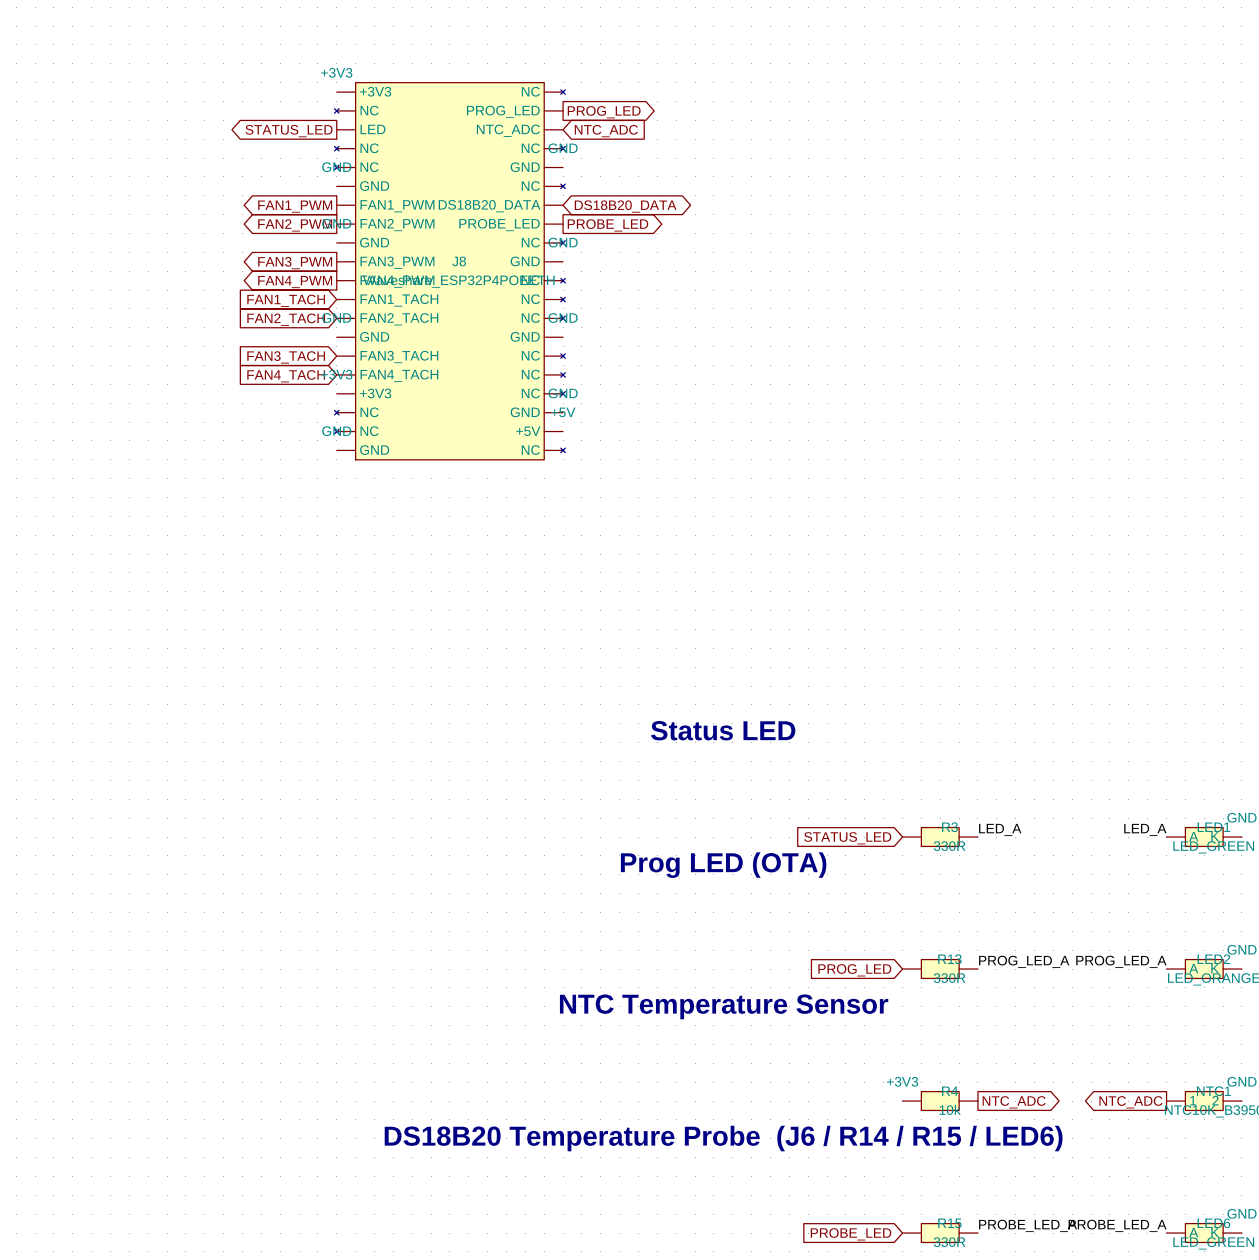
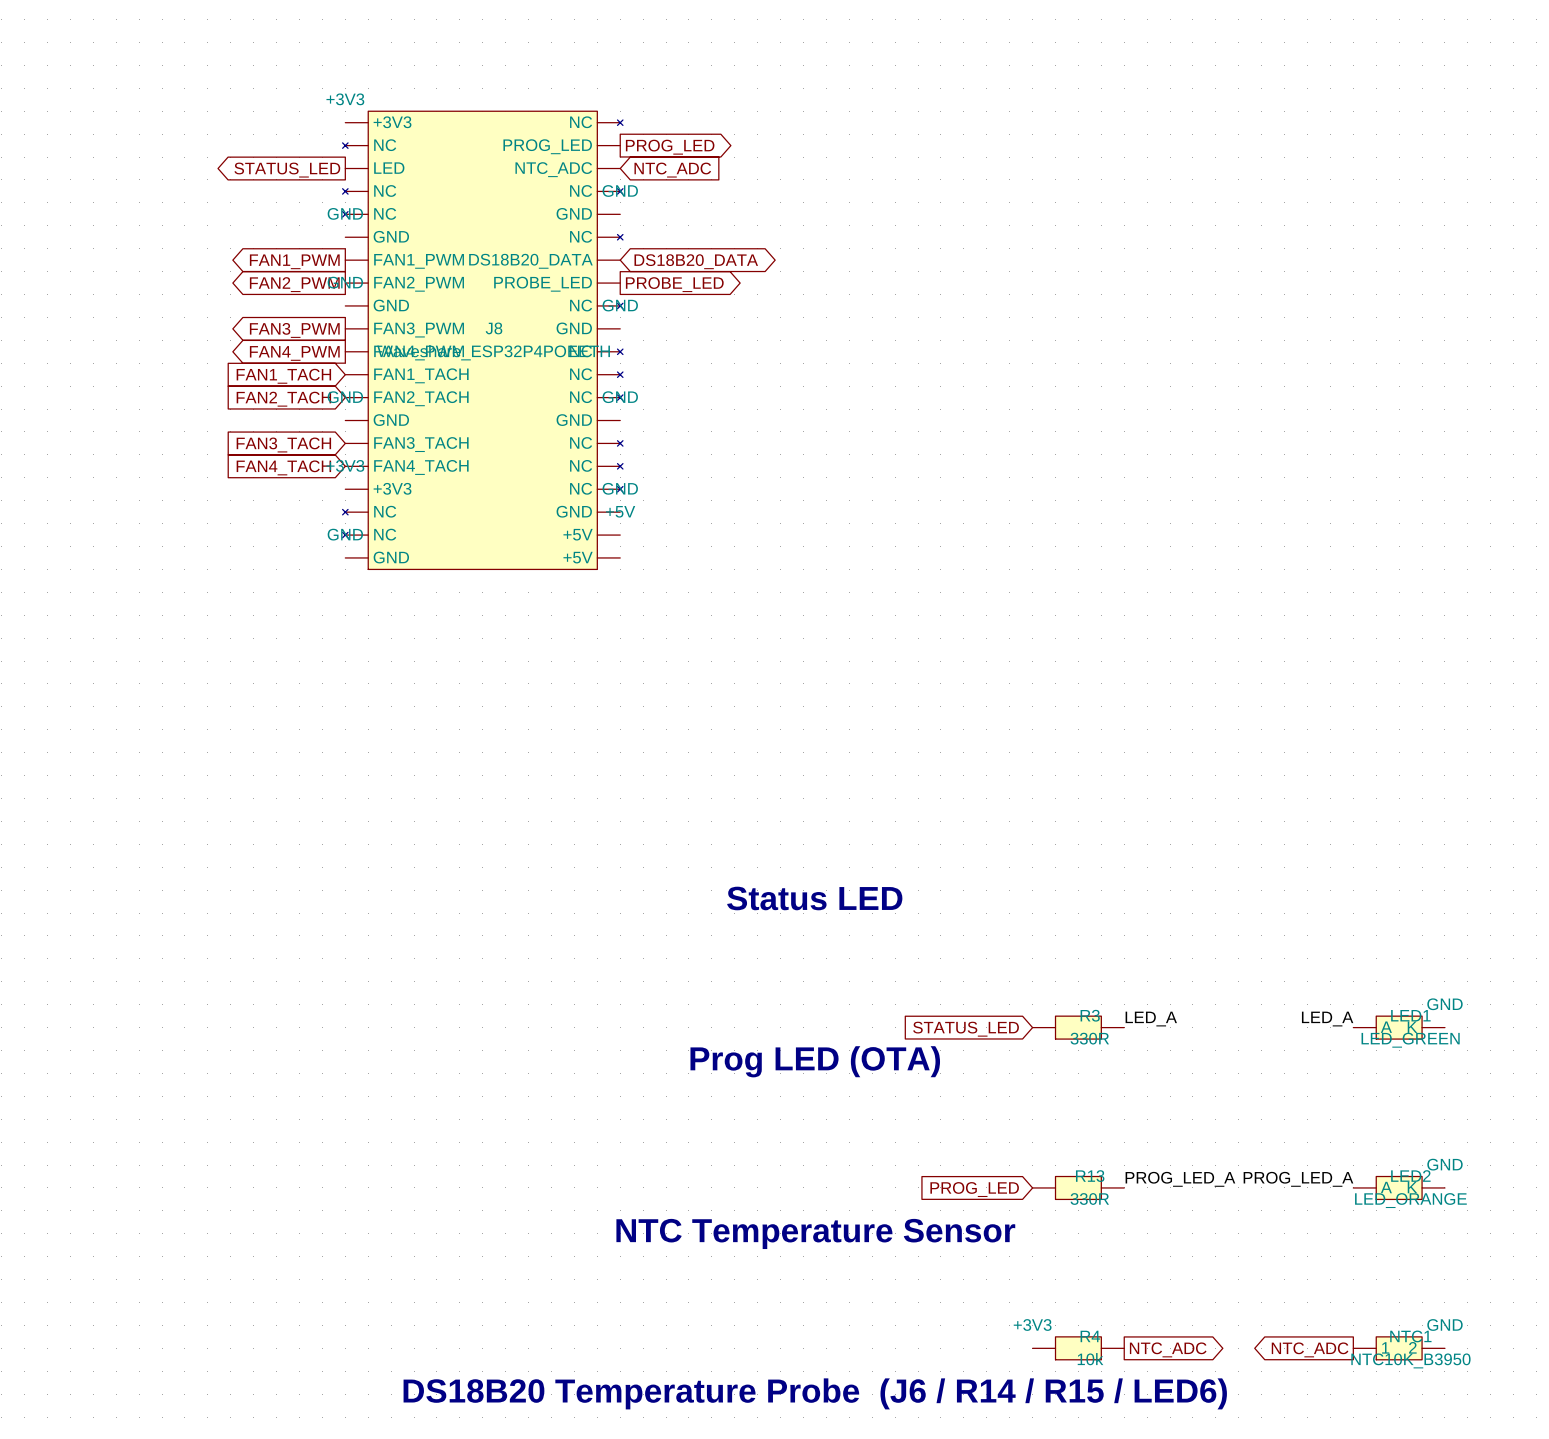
J8 symbol: [334, 82, 566, 460] -> [342, 111, 623, 570]

